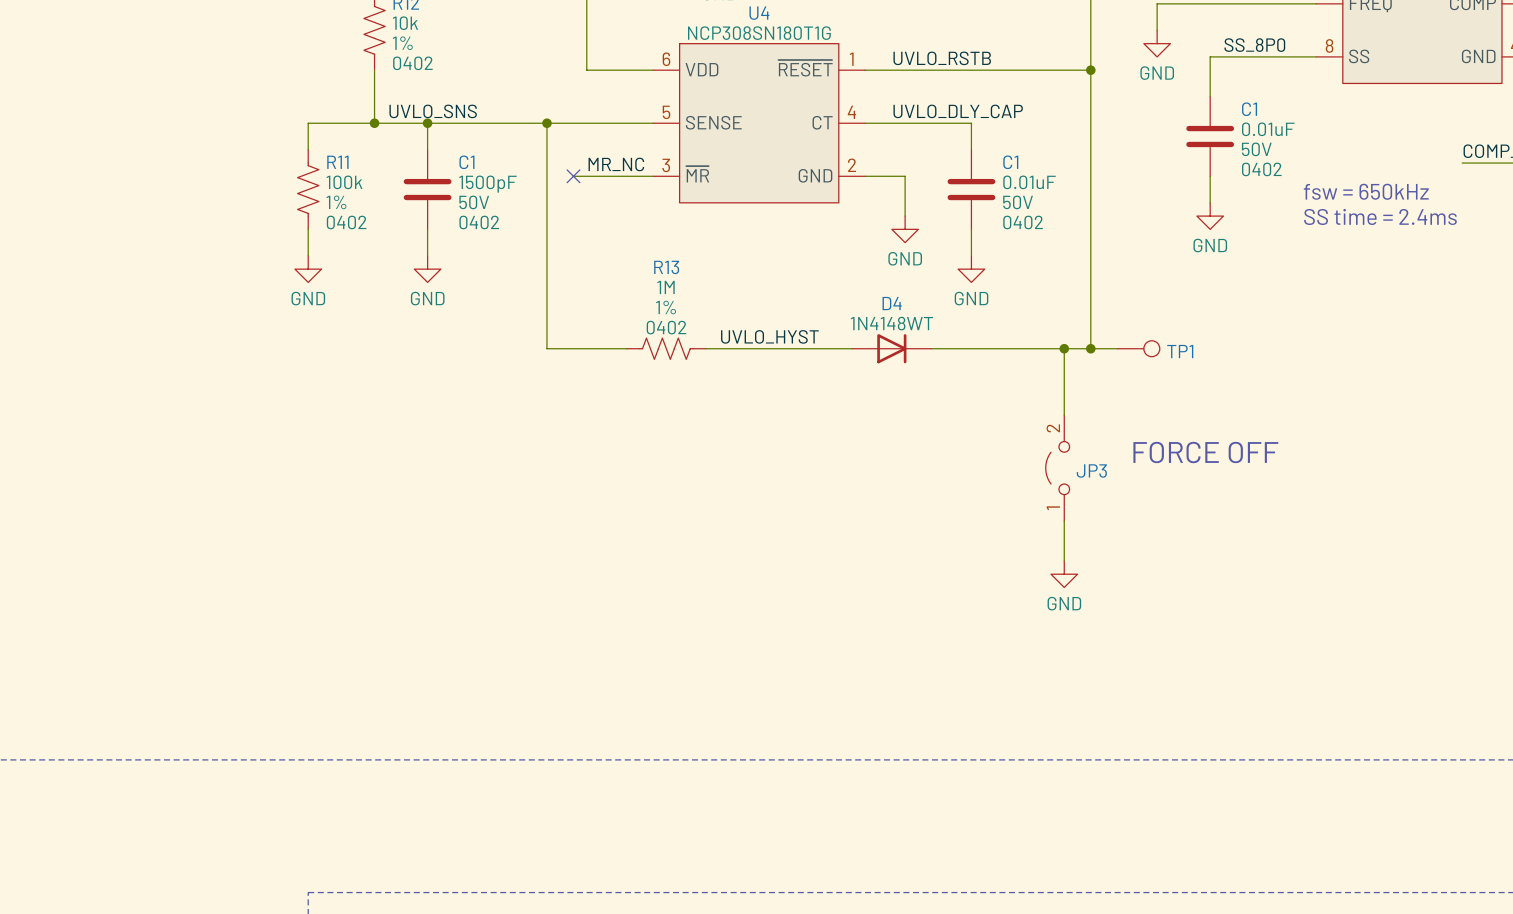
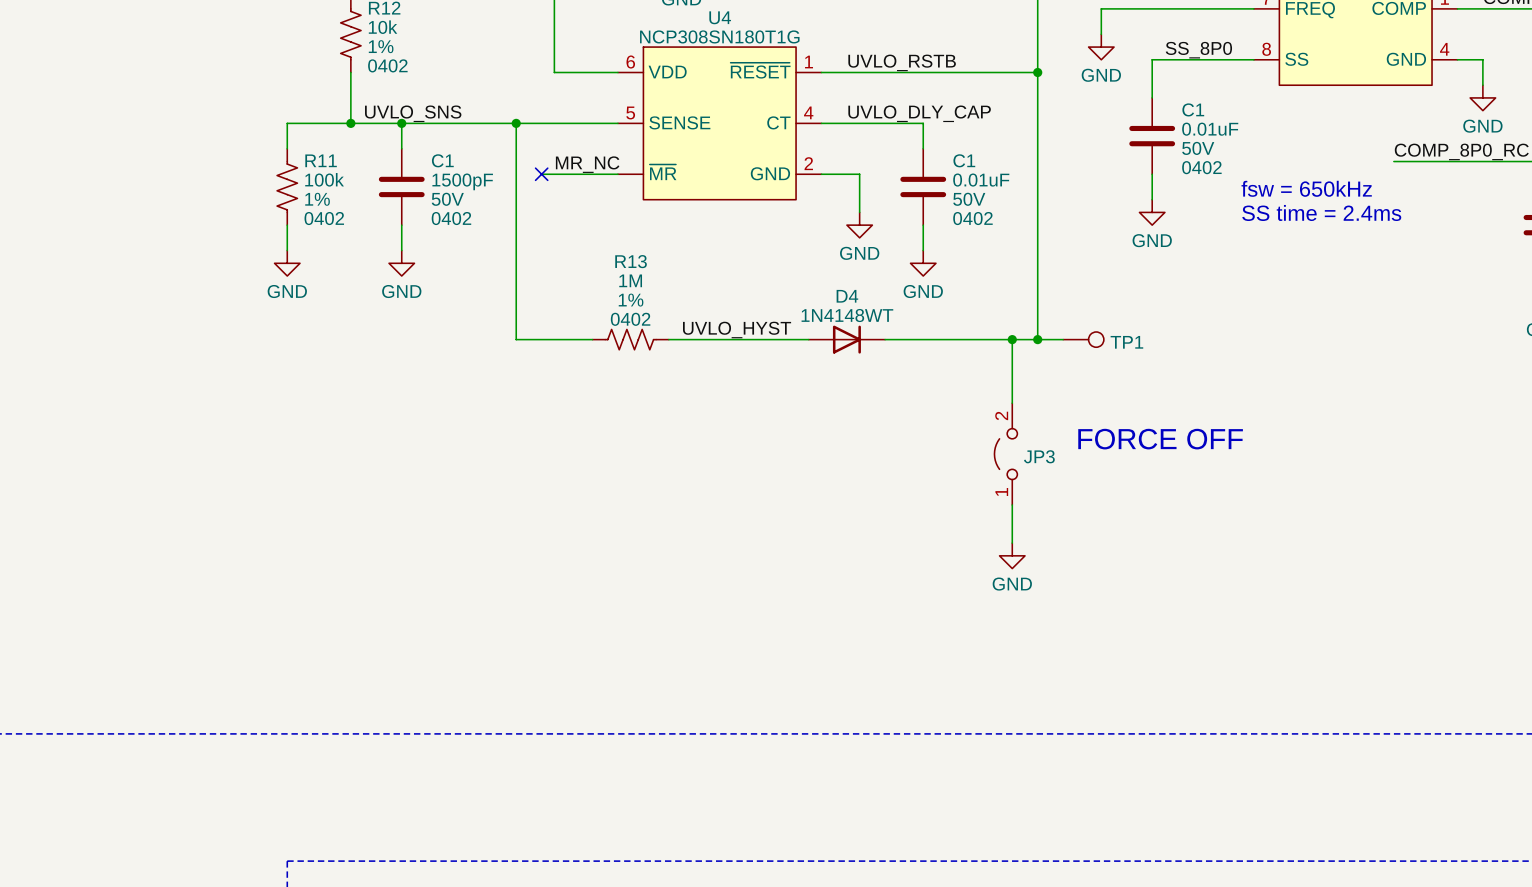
U4 pin number: 3 (666, 165) -> none

